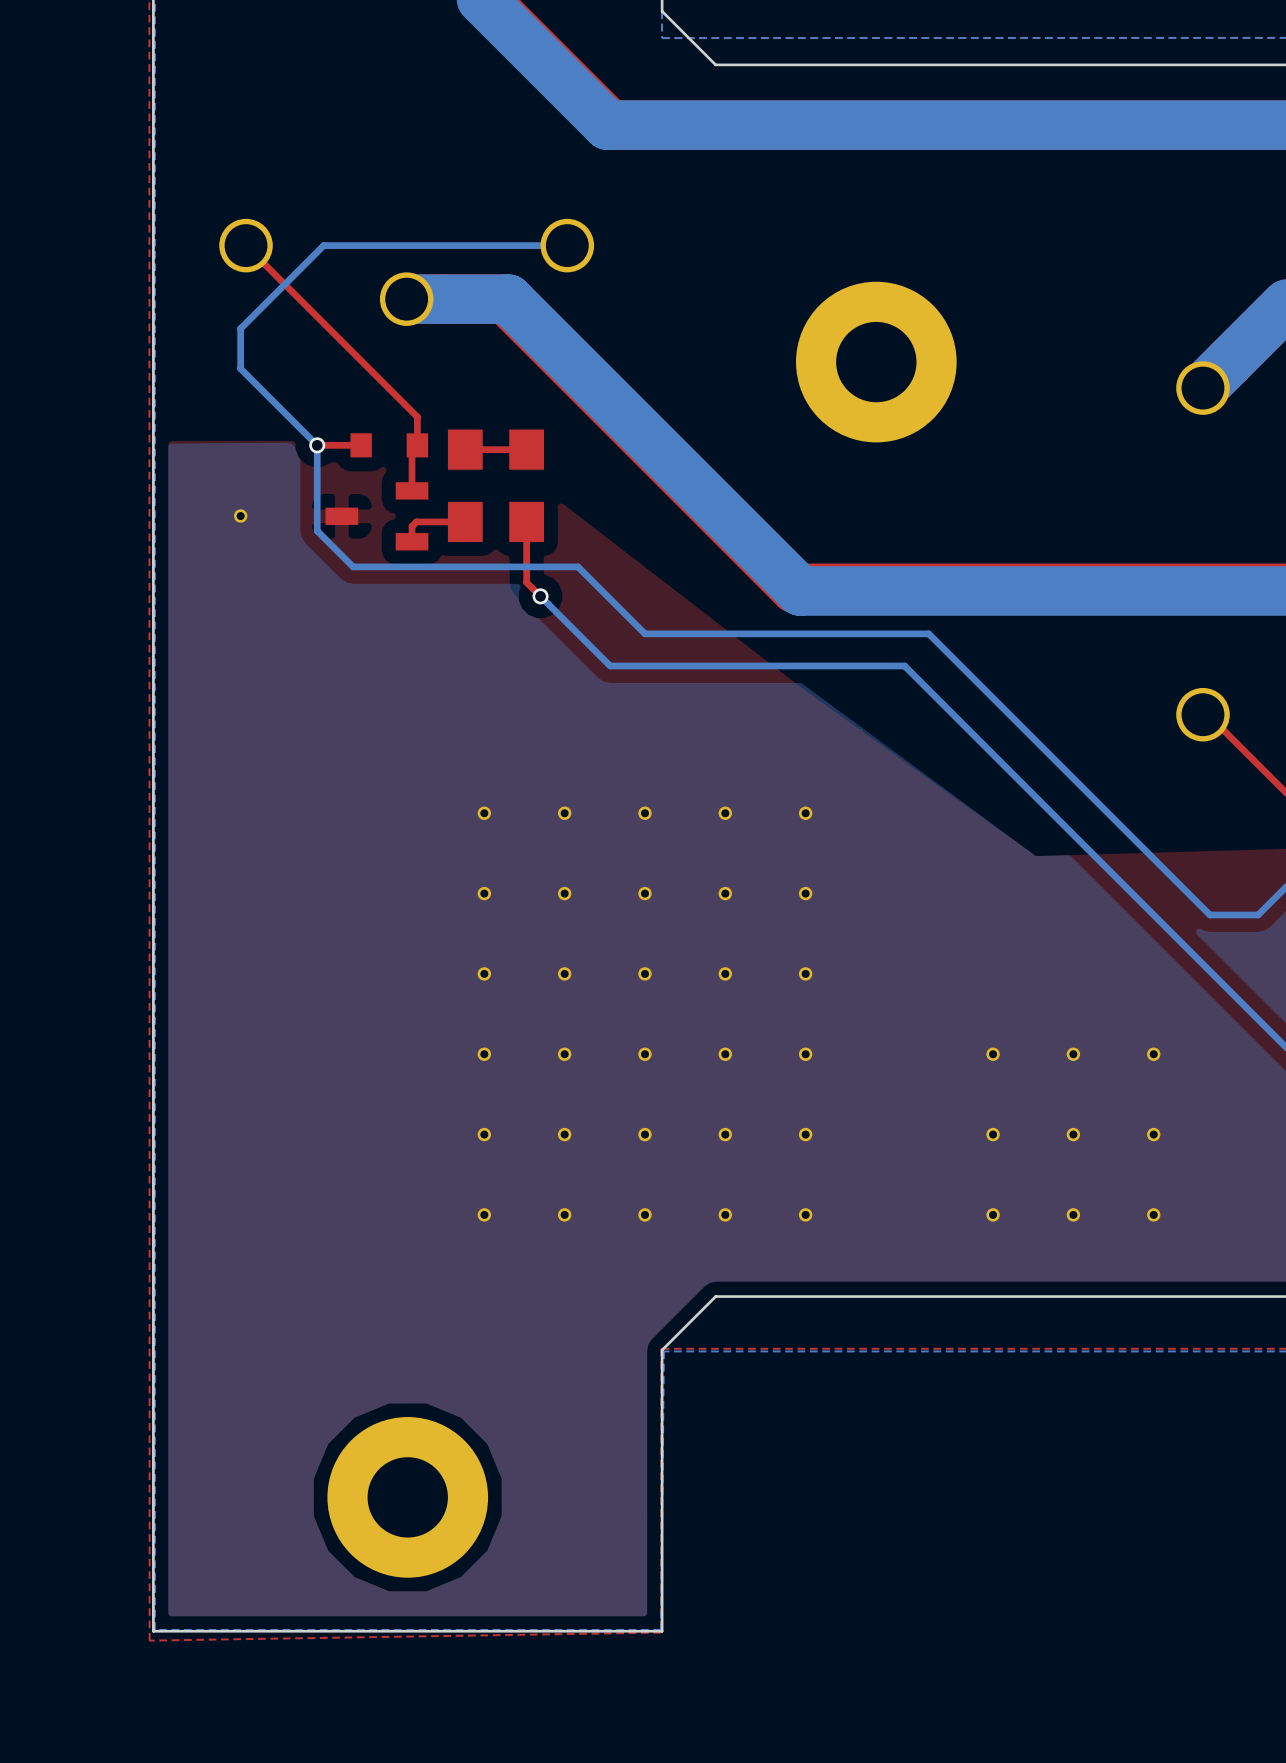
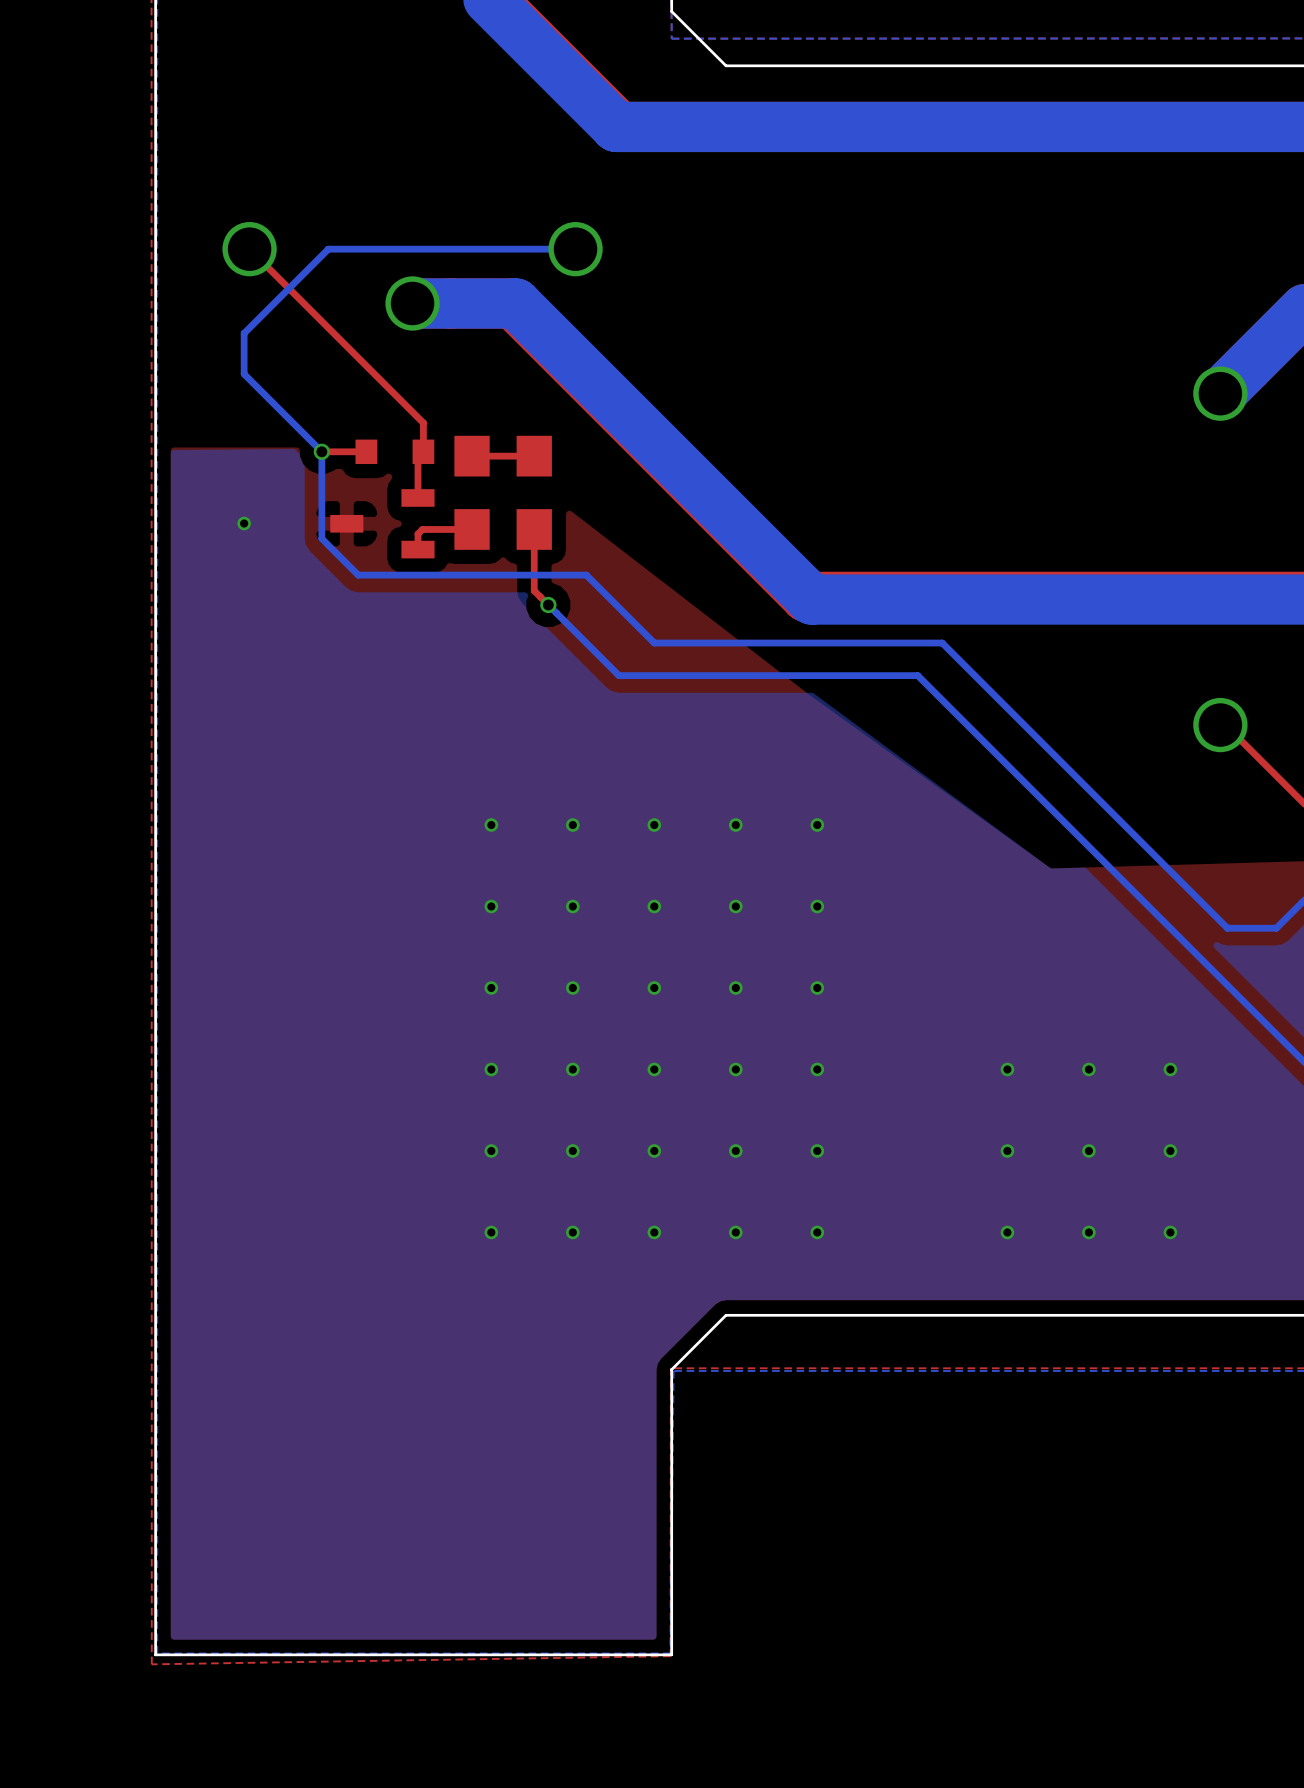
part: (876, 362) -> none
part: (407, 1497) -> none

